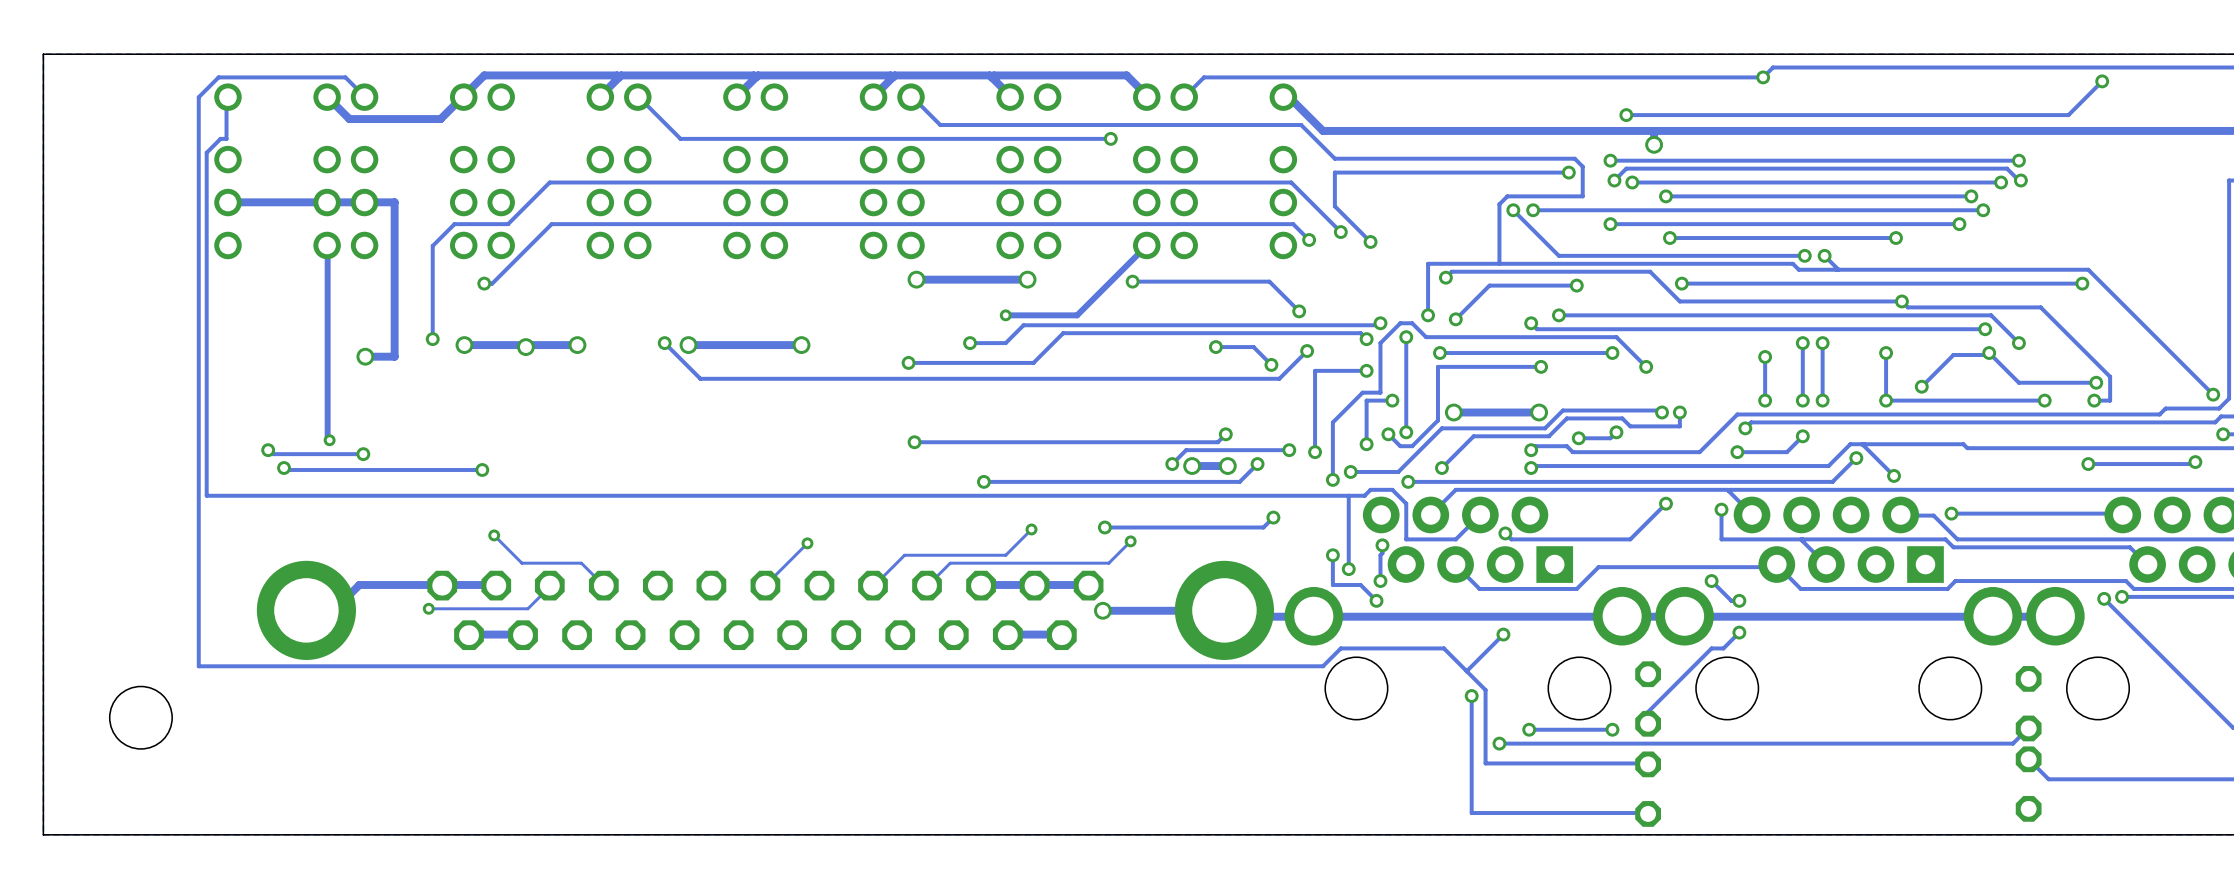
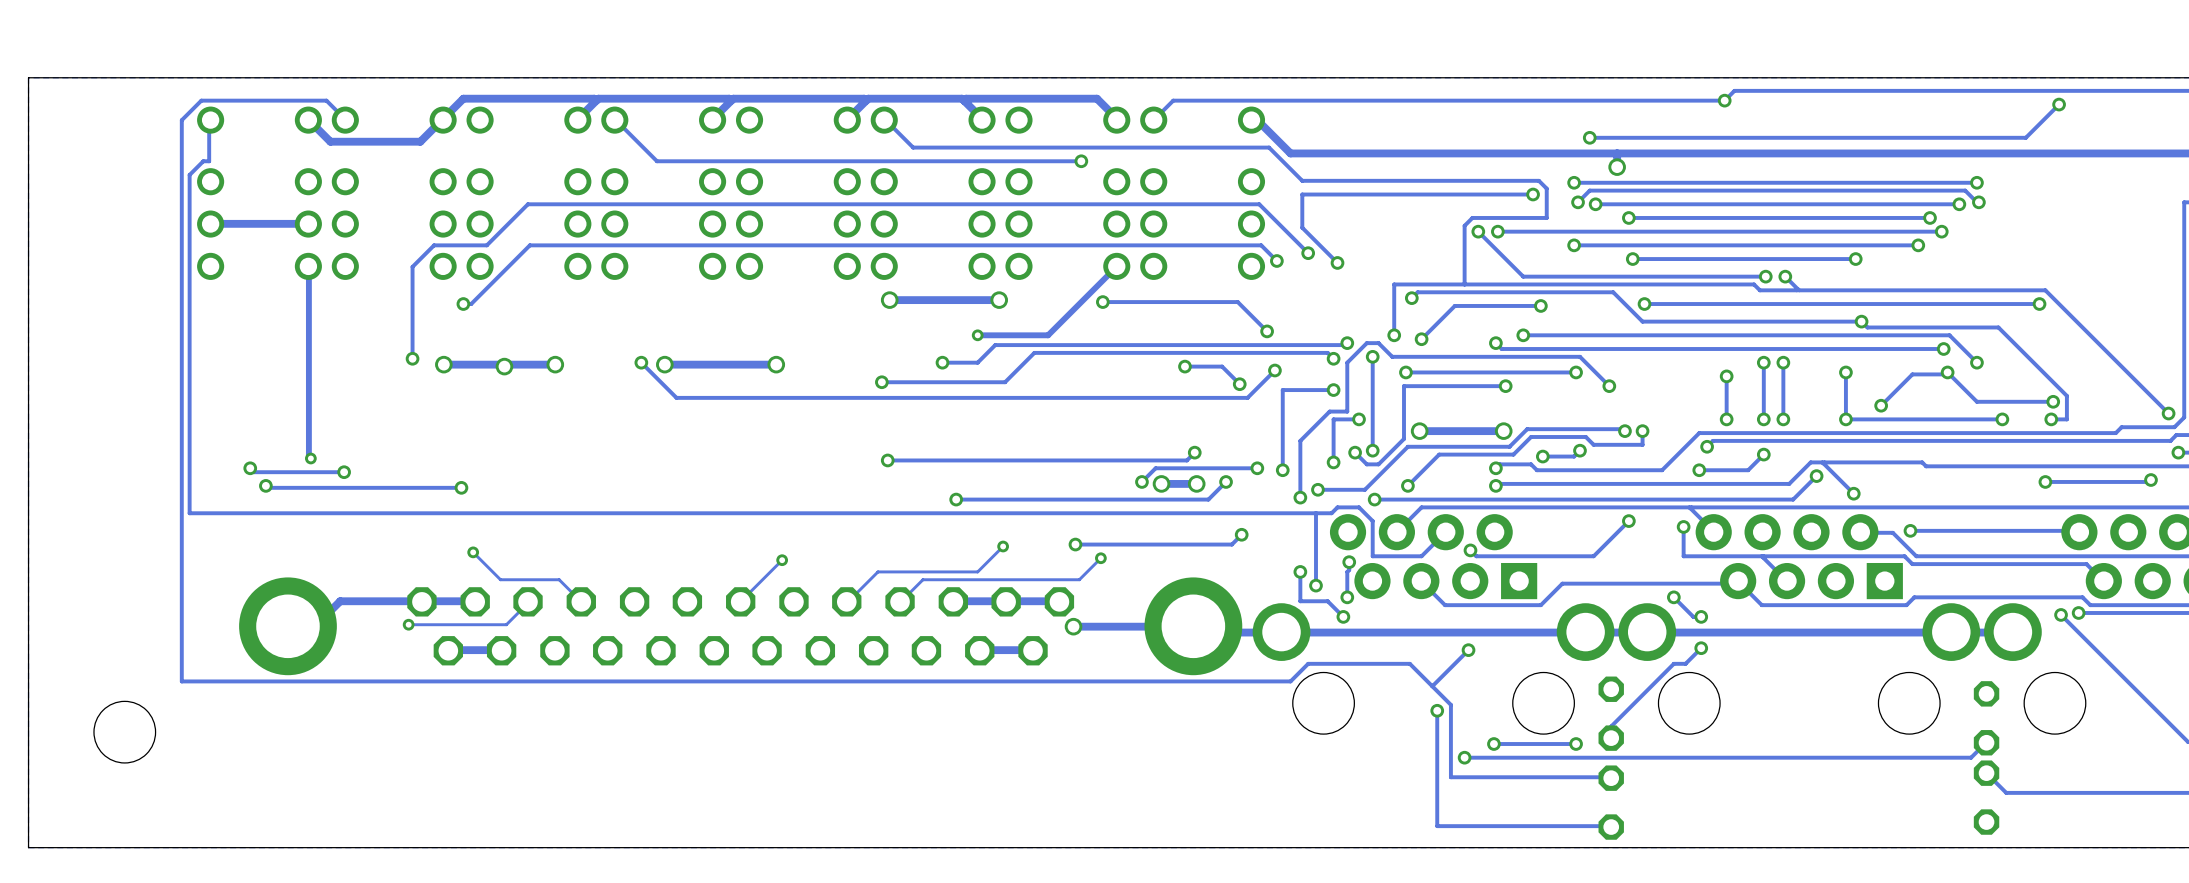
track: (327, 202) (394, 202) (394, 356) (365, 356) -> none
via: (365, 356) -> none

